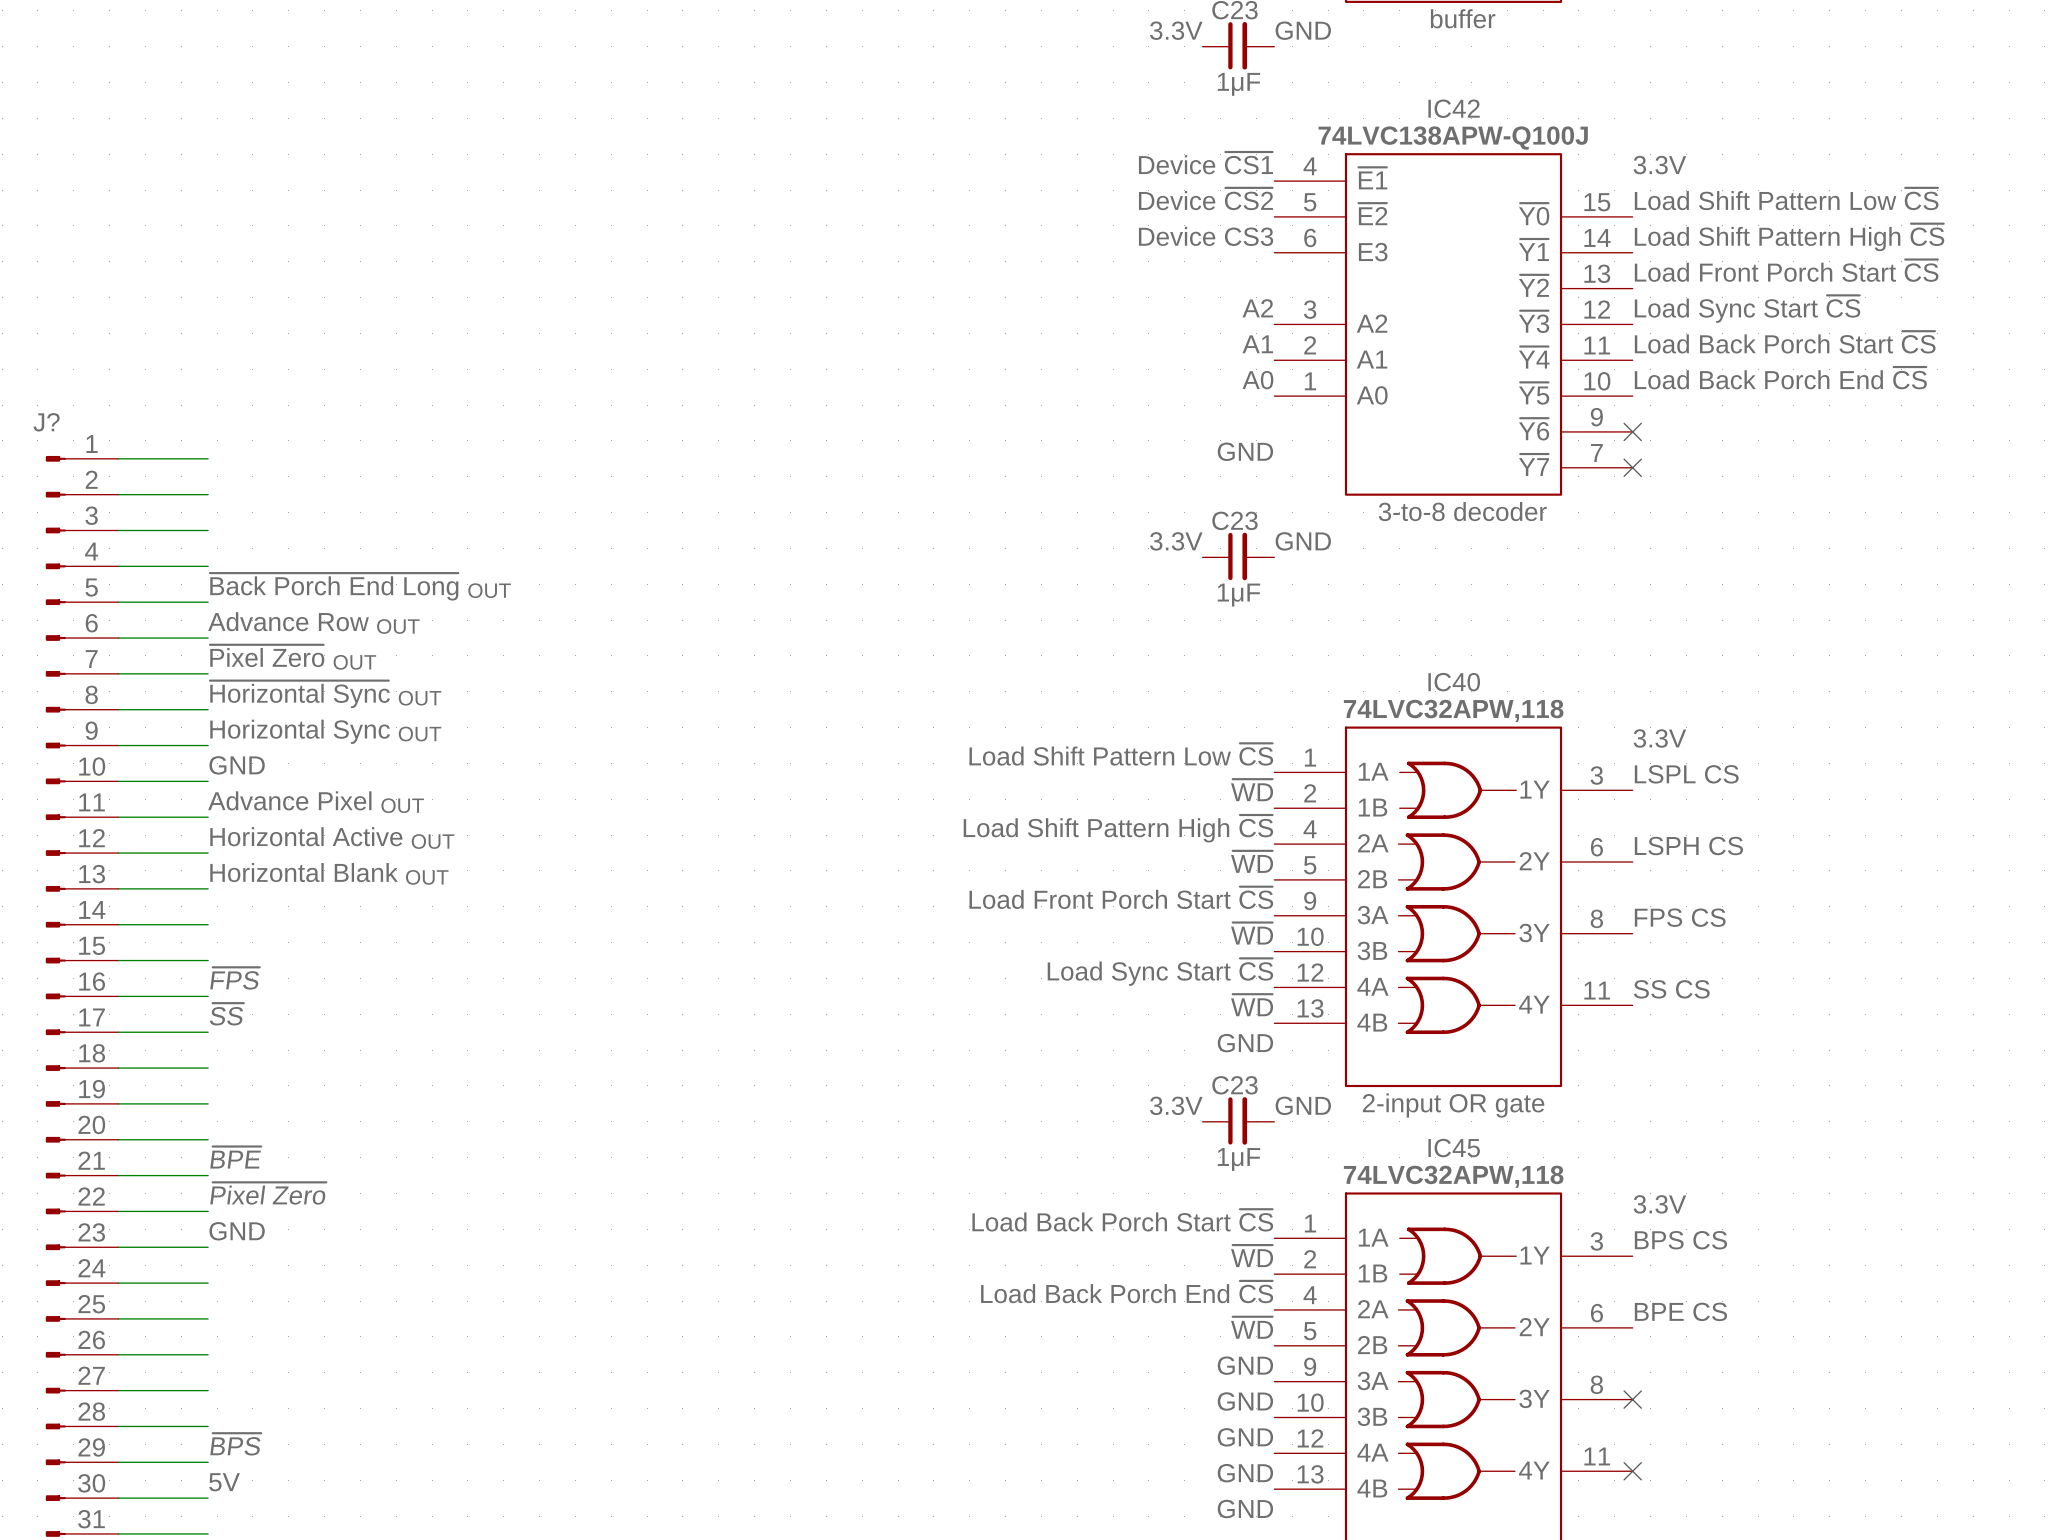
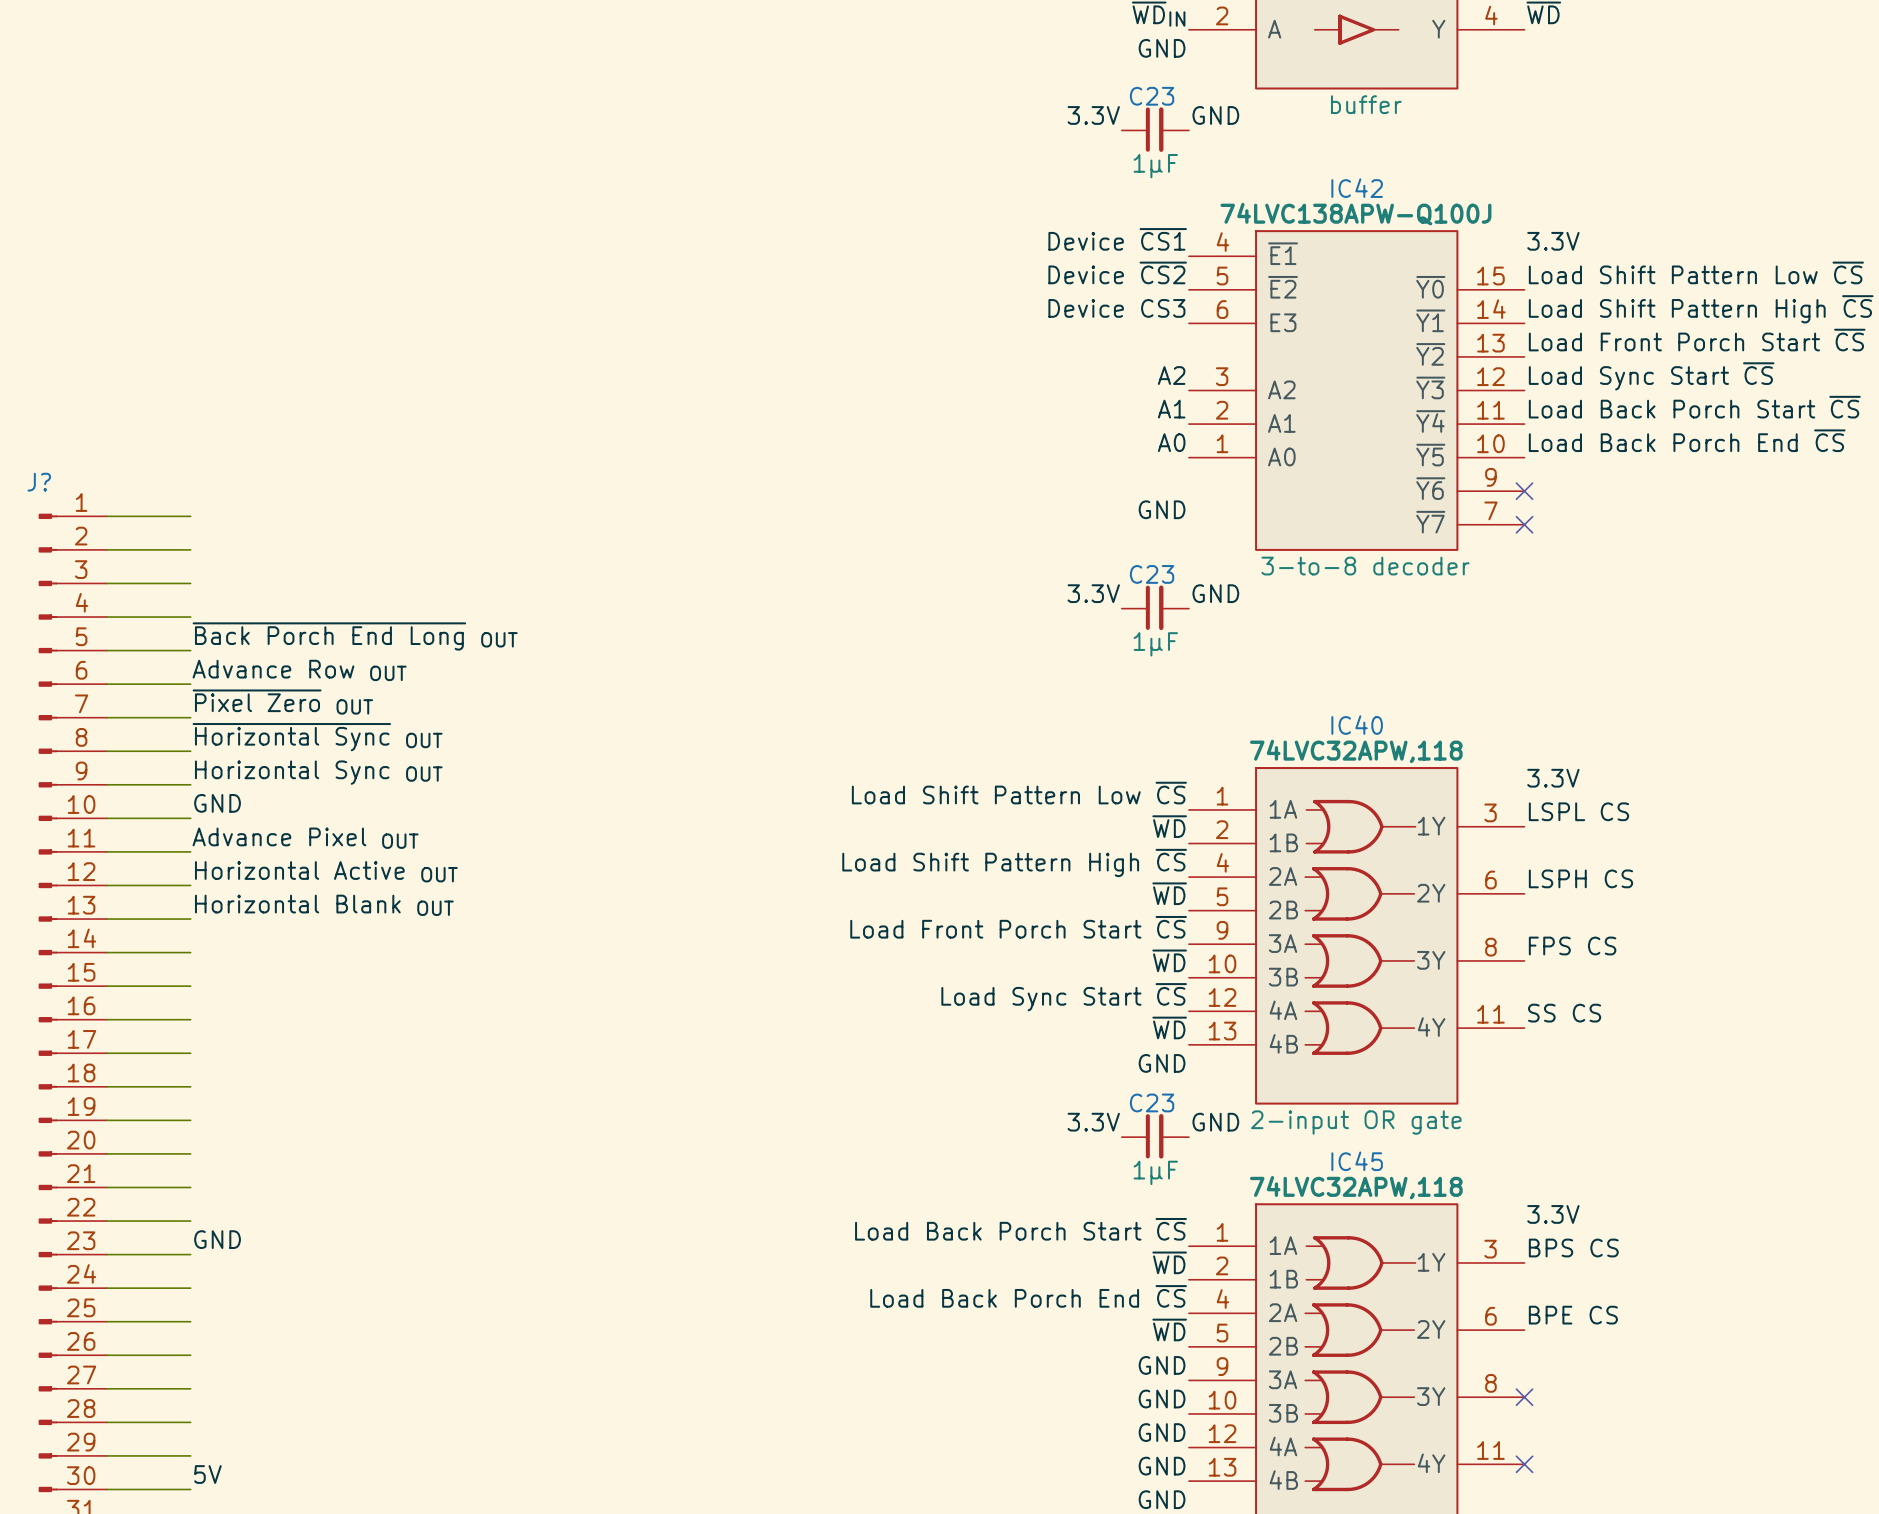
label: ~{FPS} (235, 978) -> none
label: ~{SS} (226, 1014) -> none
label: ~{BPE} (235, 1157) -> none
label: ~{Pixel Zero} (268, 1193) -> none
label: ~{BPS} (235, 1444) -> none

